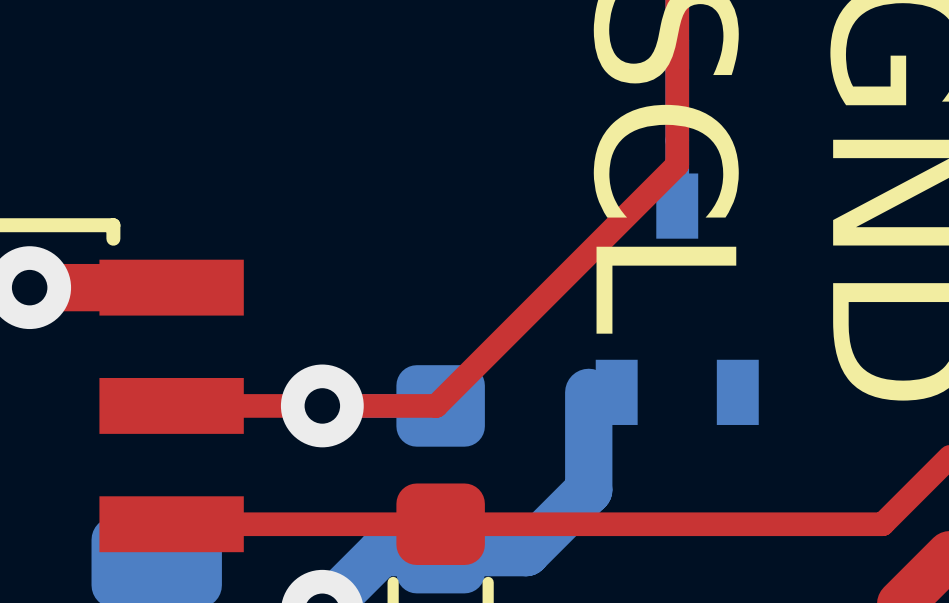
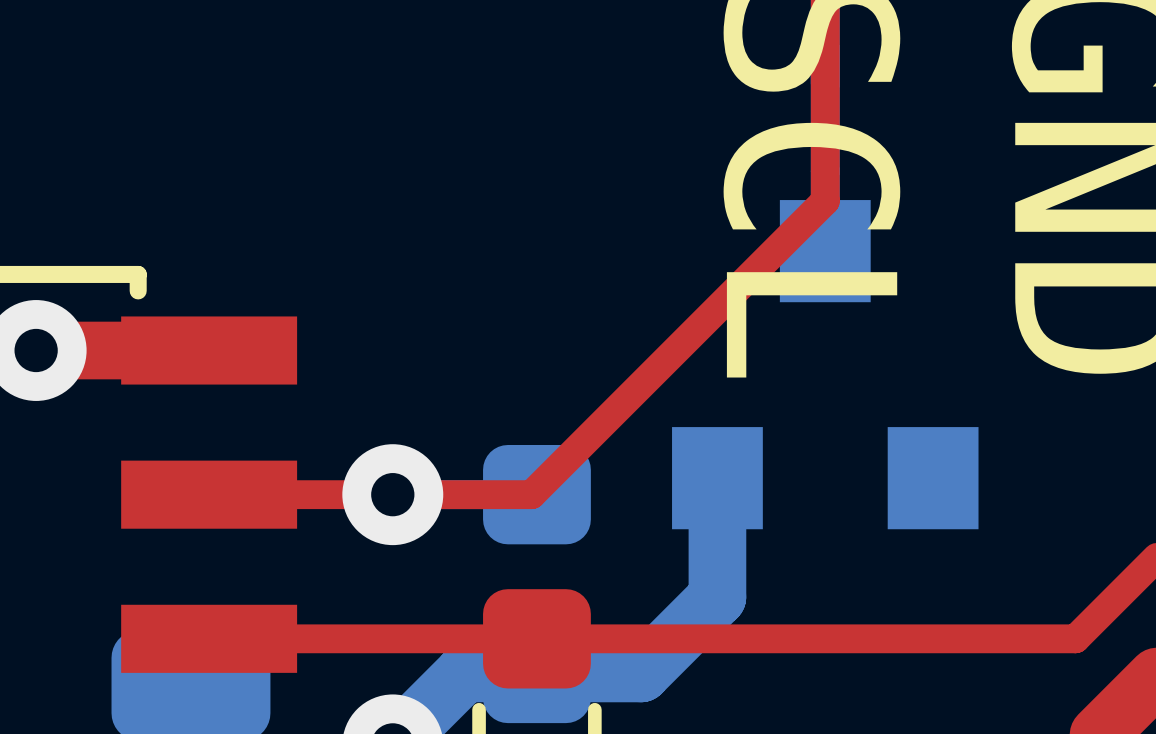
part footprint: [595, 173, 759, 425] -> [672, 200, 979, 530]

